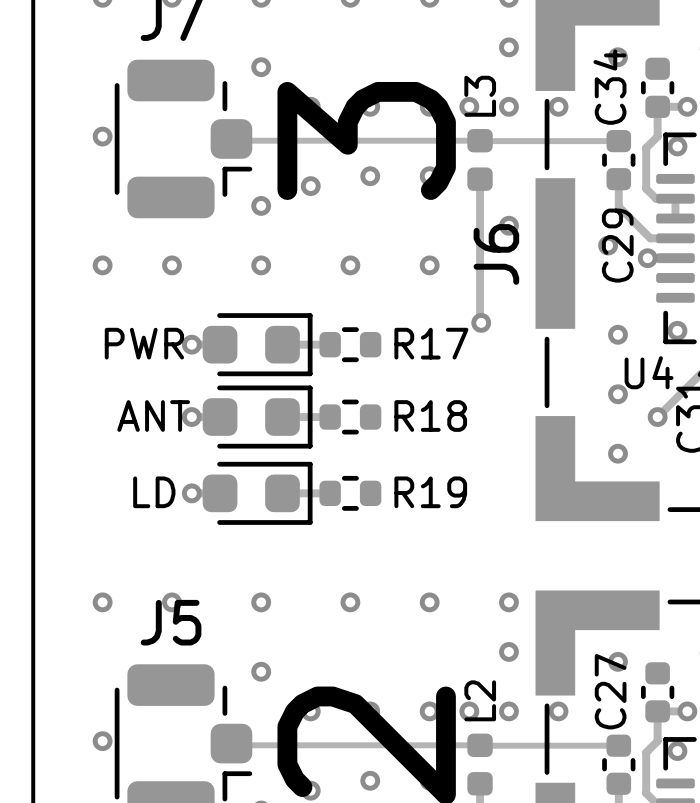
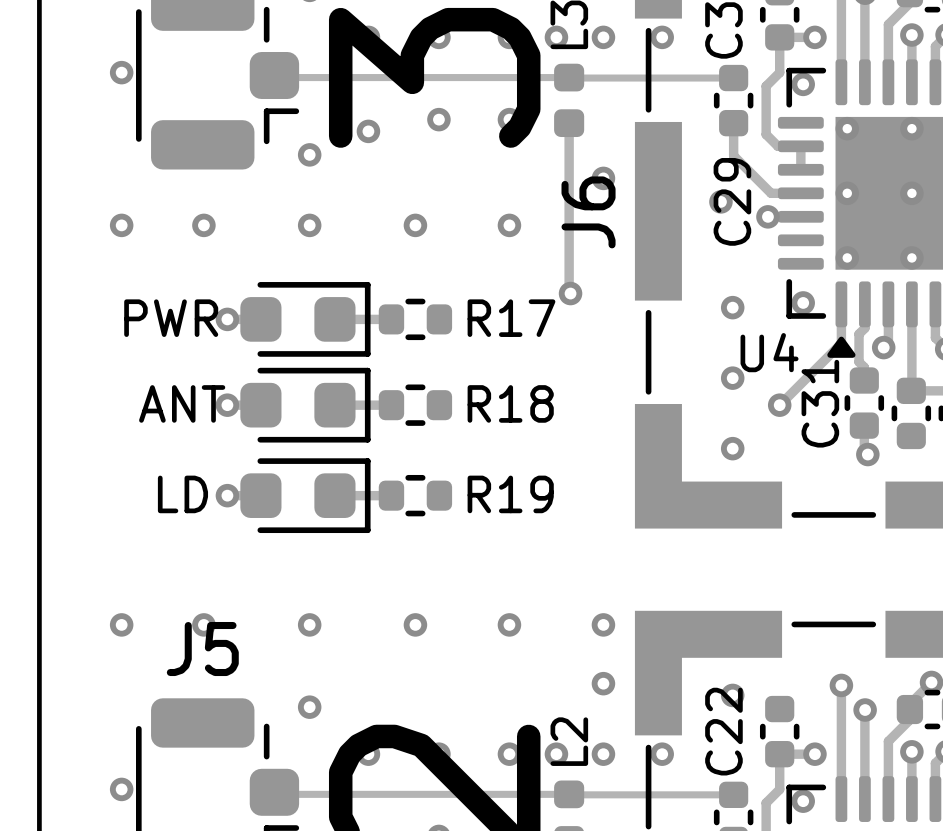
C27 name: C27 (610, 691) -> C22 (723, 731)

